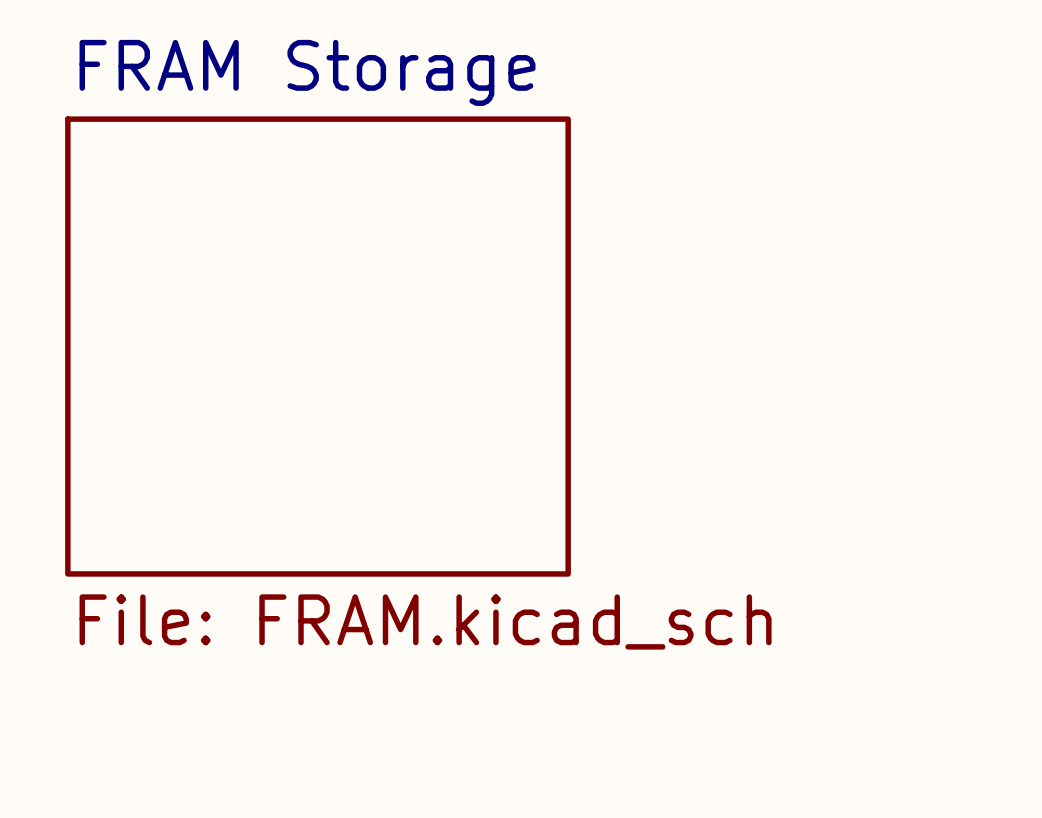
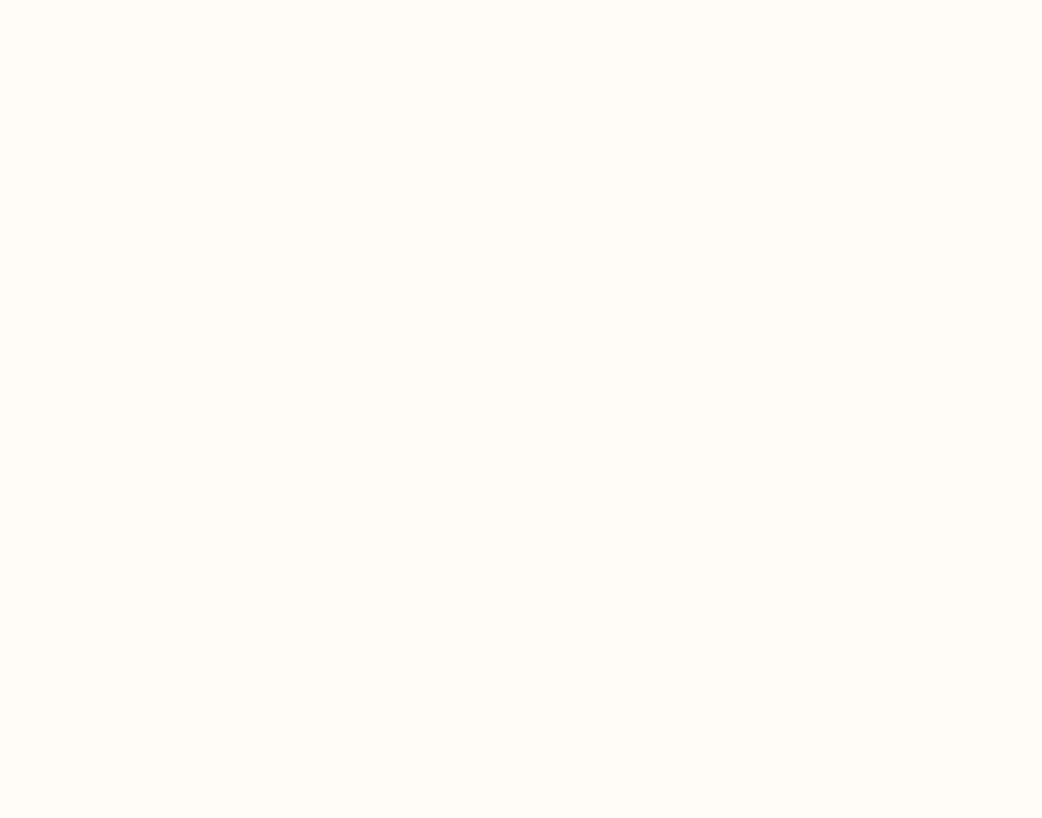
sheet FRAM Storage: File: FRAM.kicad_sch (318, 346) -> none

